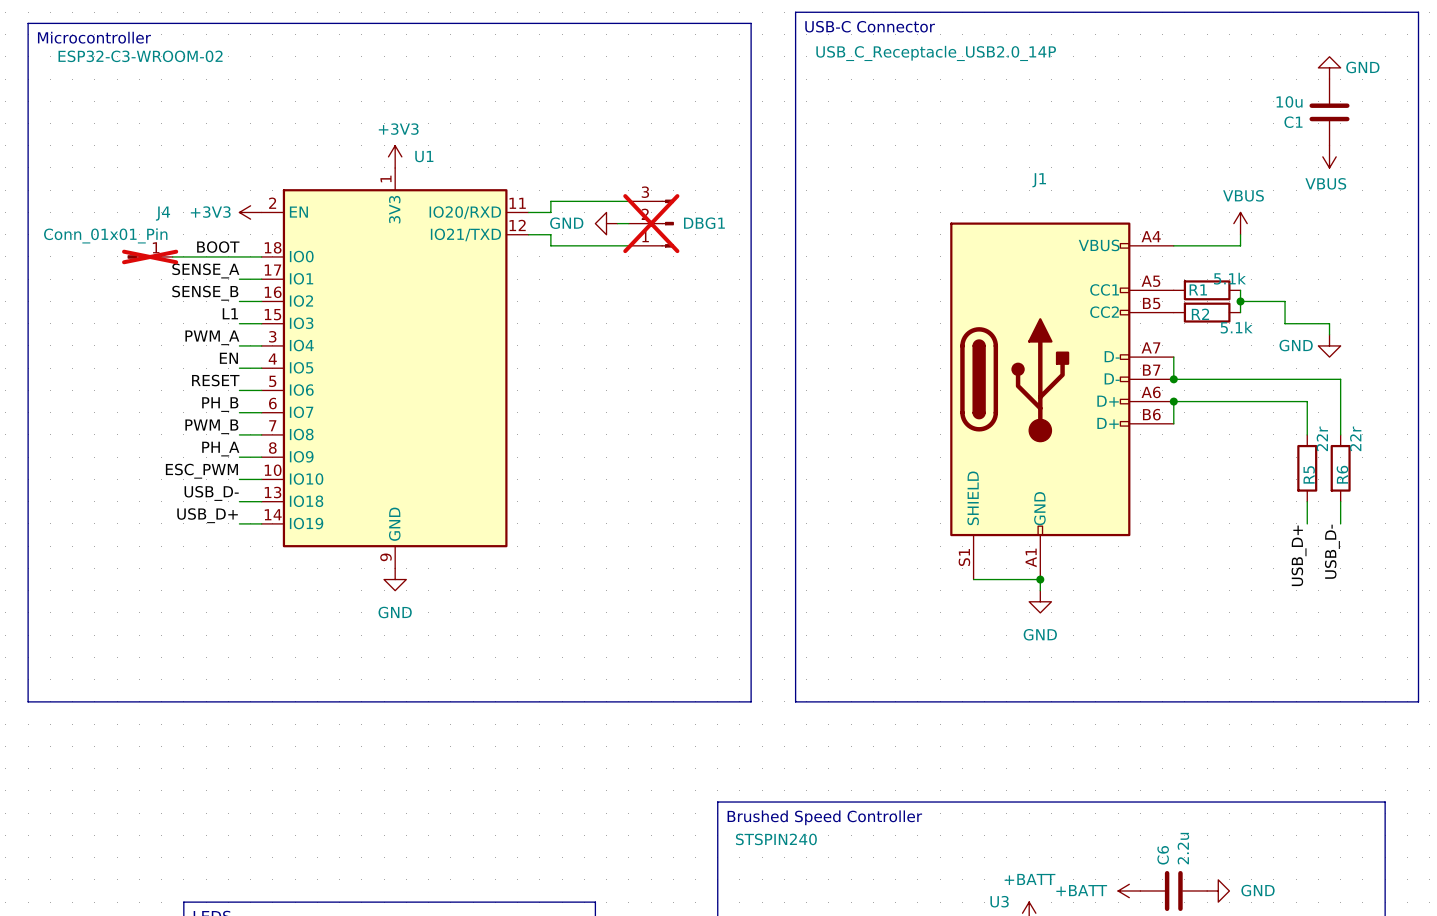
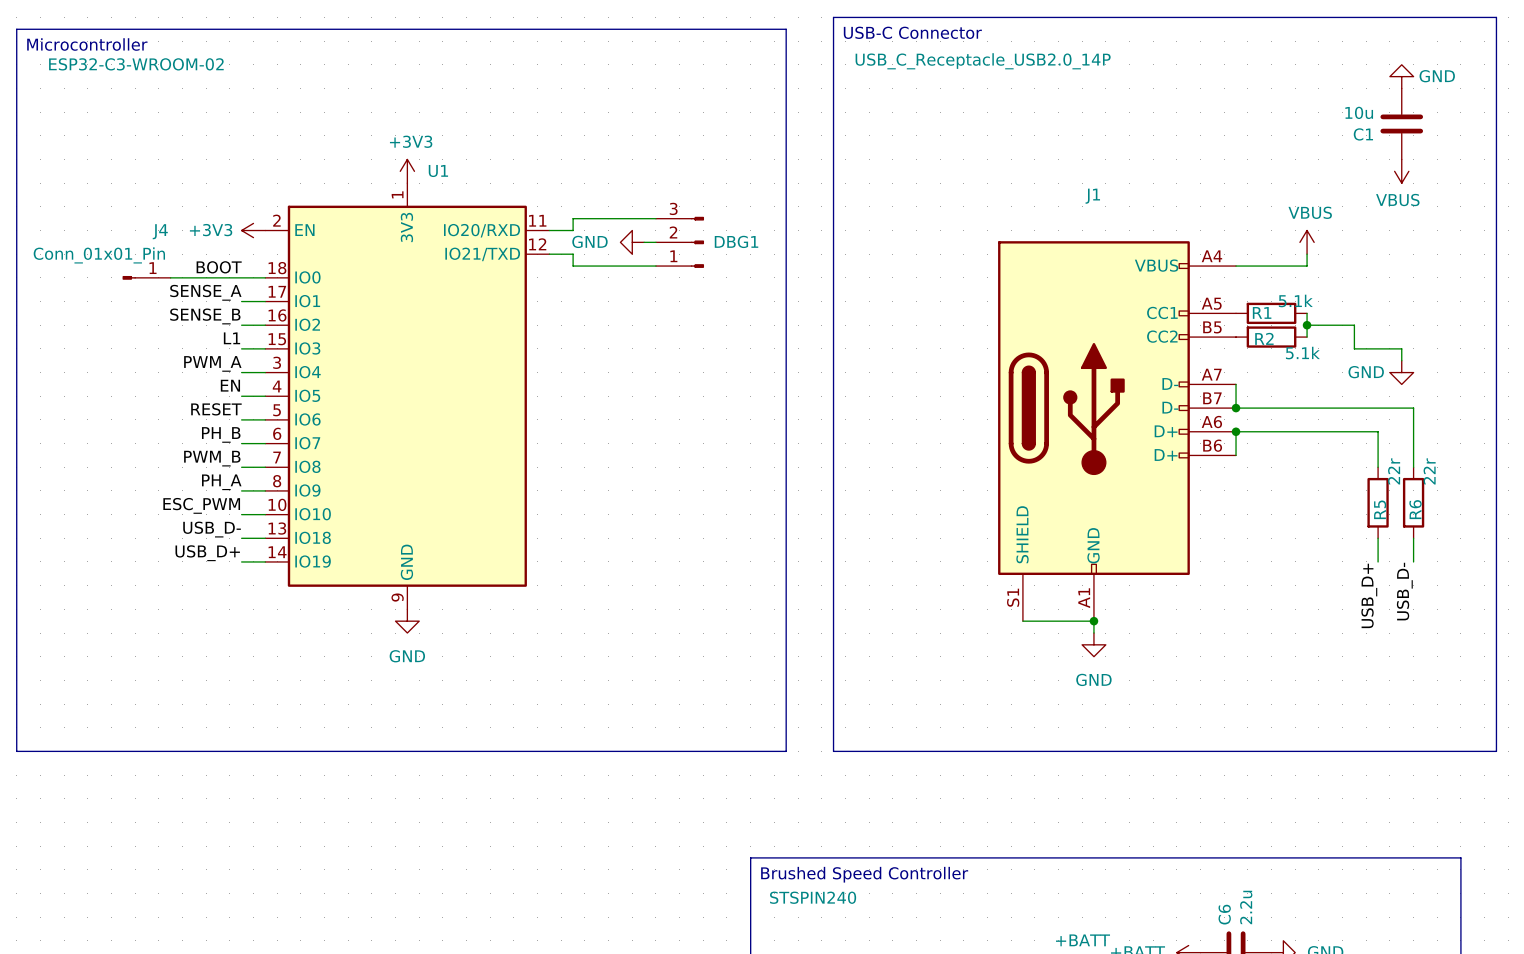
DBG1 do-not-place cross: (651, 223) -> none
J4 do-not-place cross: (150, 256) -> none

